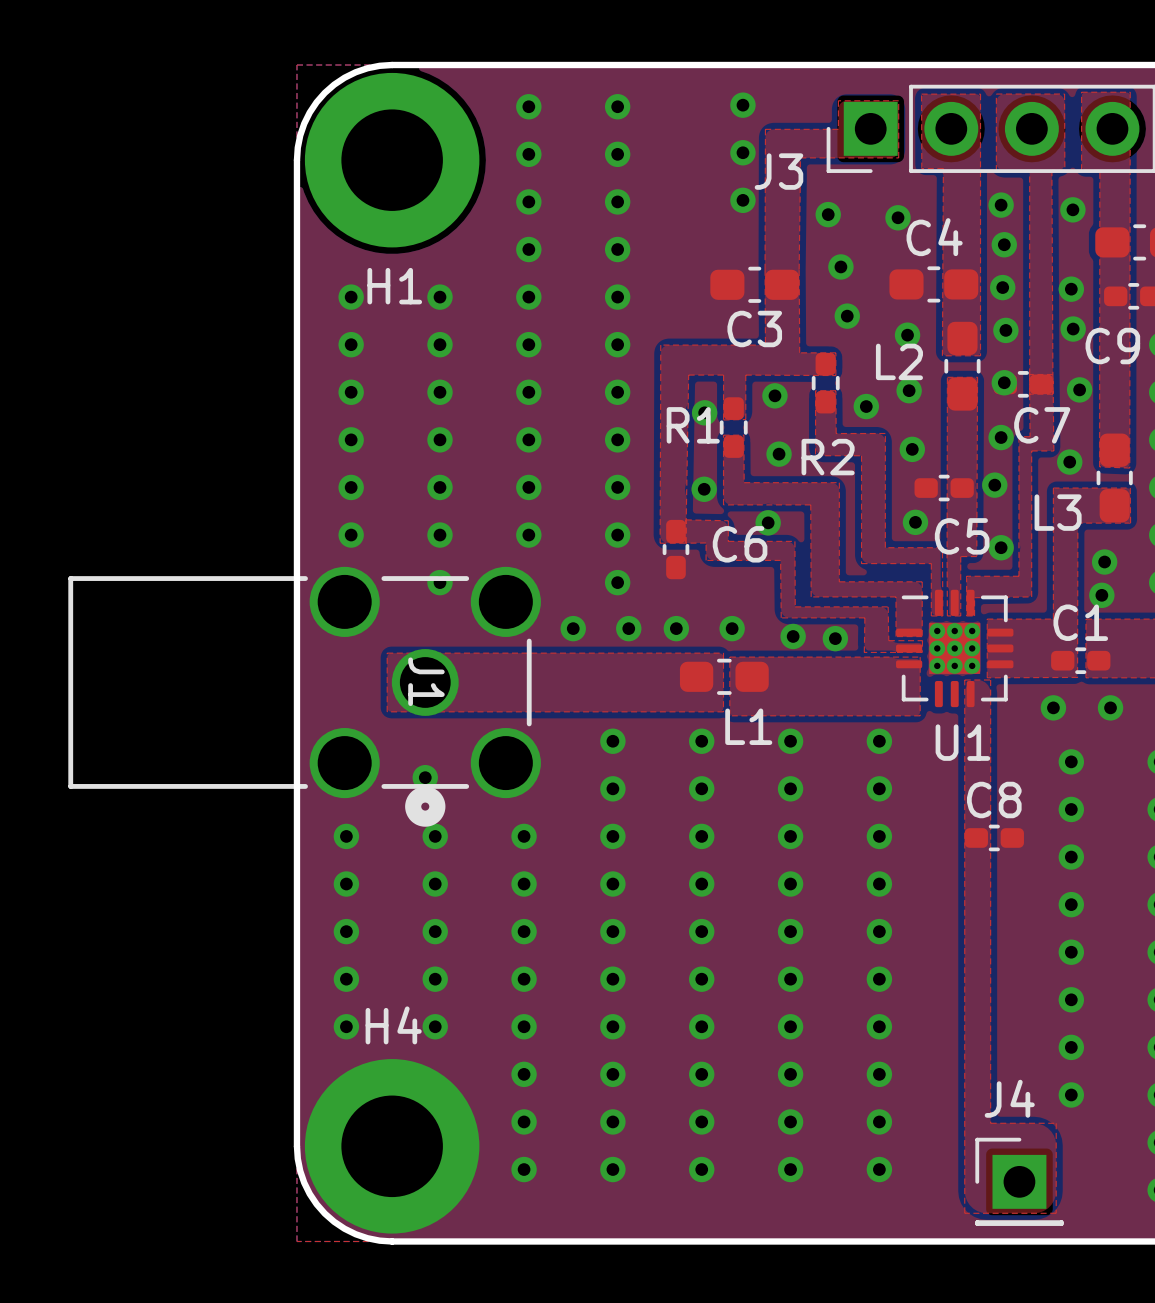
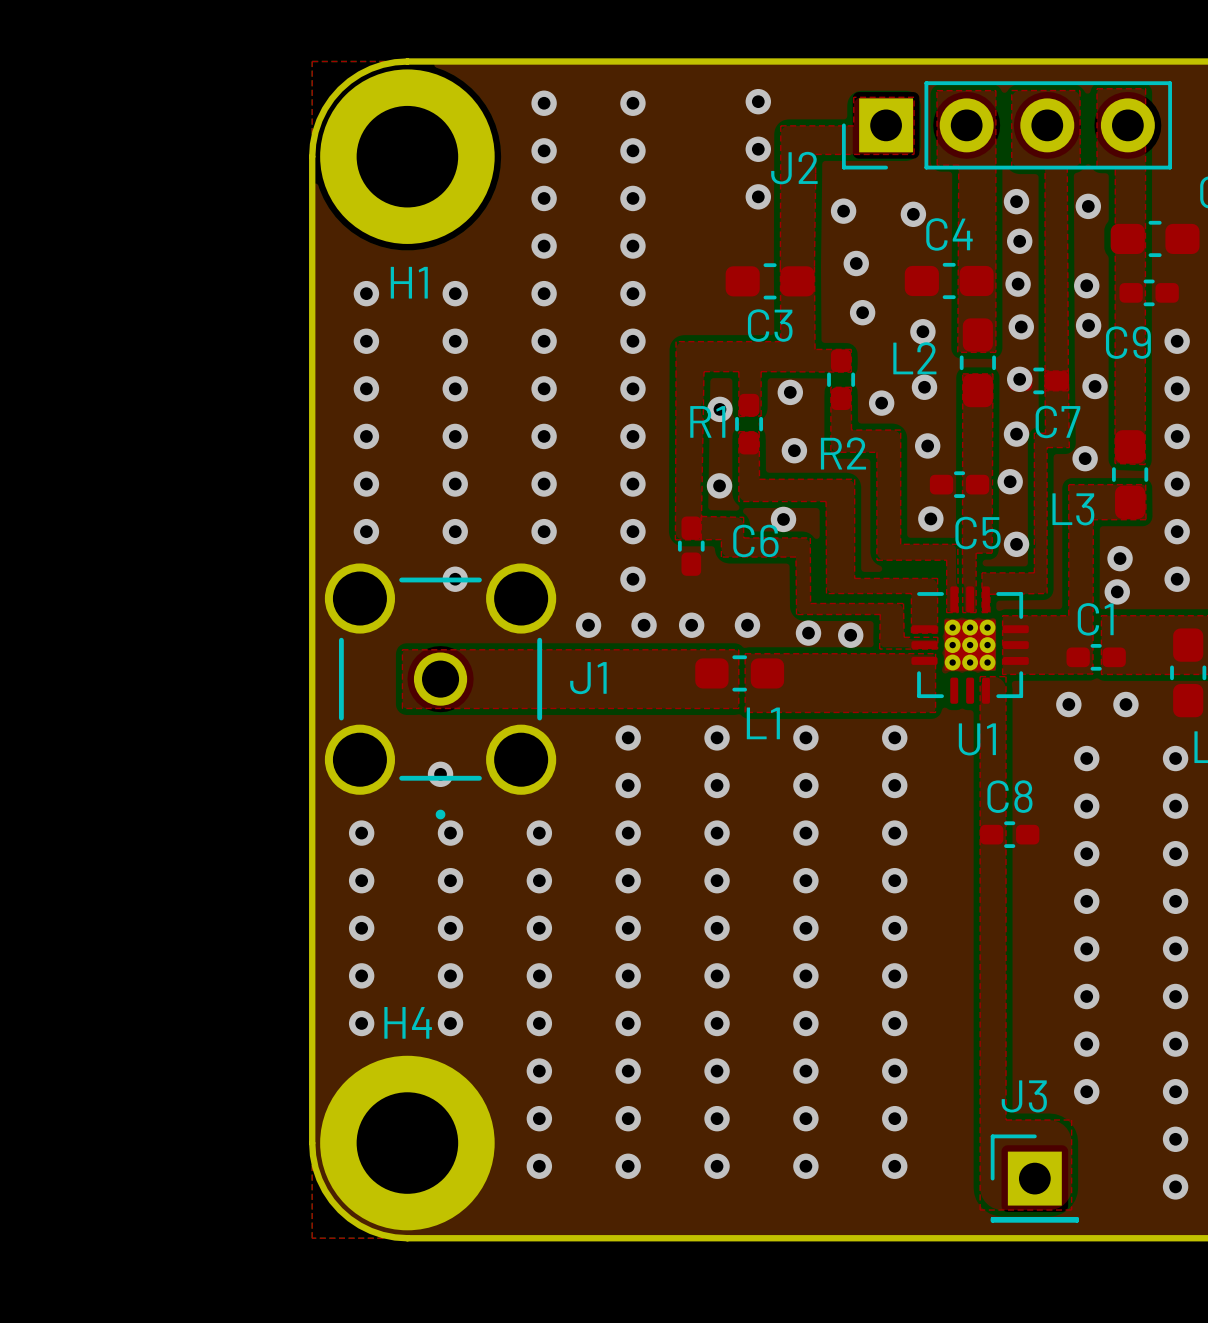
J3 name: J3 (778, 171) -> J2 (794, 168)
J1 footprint: [68, 566, 541, 827] -> [324, 563, 557, 820]
J4 name: J4 (1009, 1098) -> J3 (1024, 1096)

